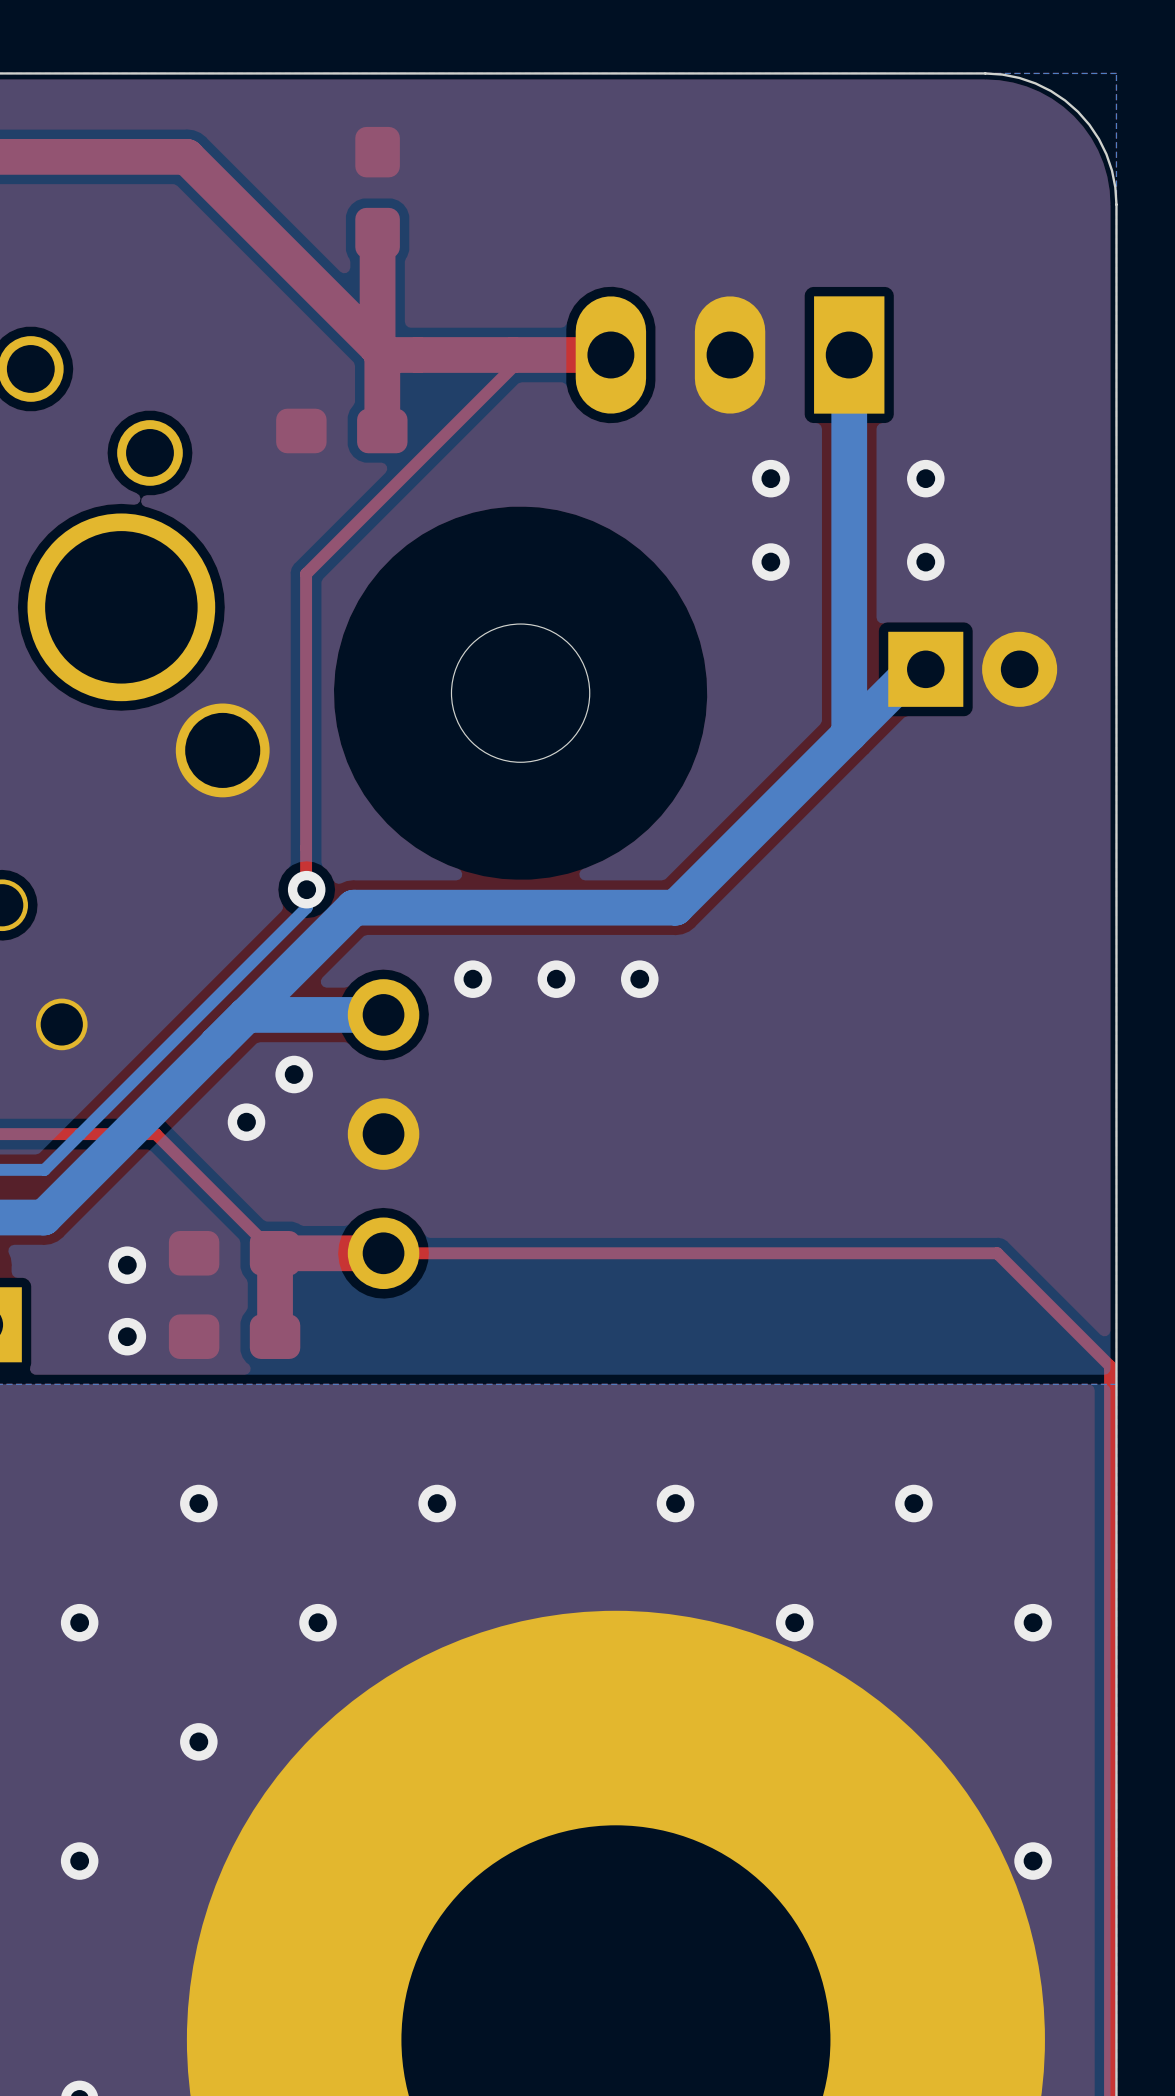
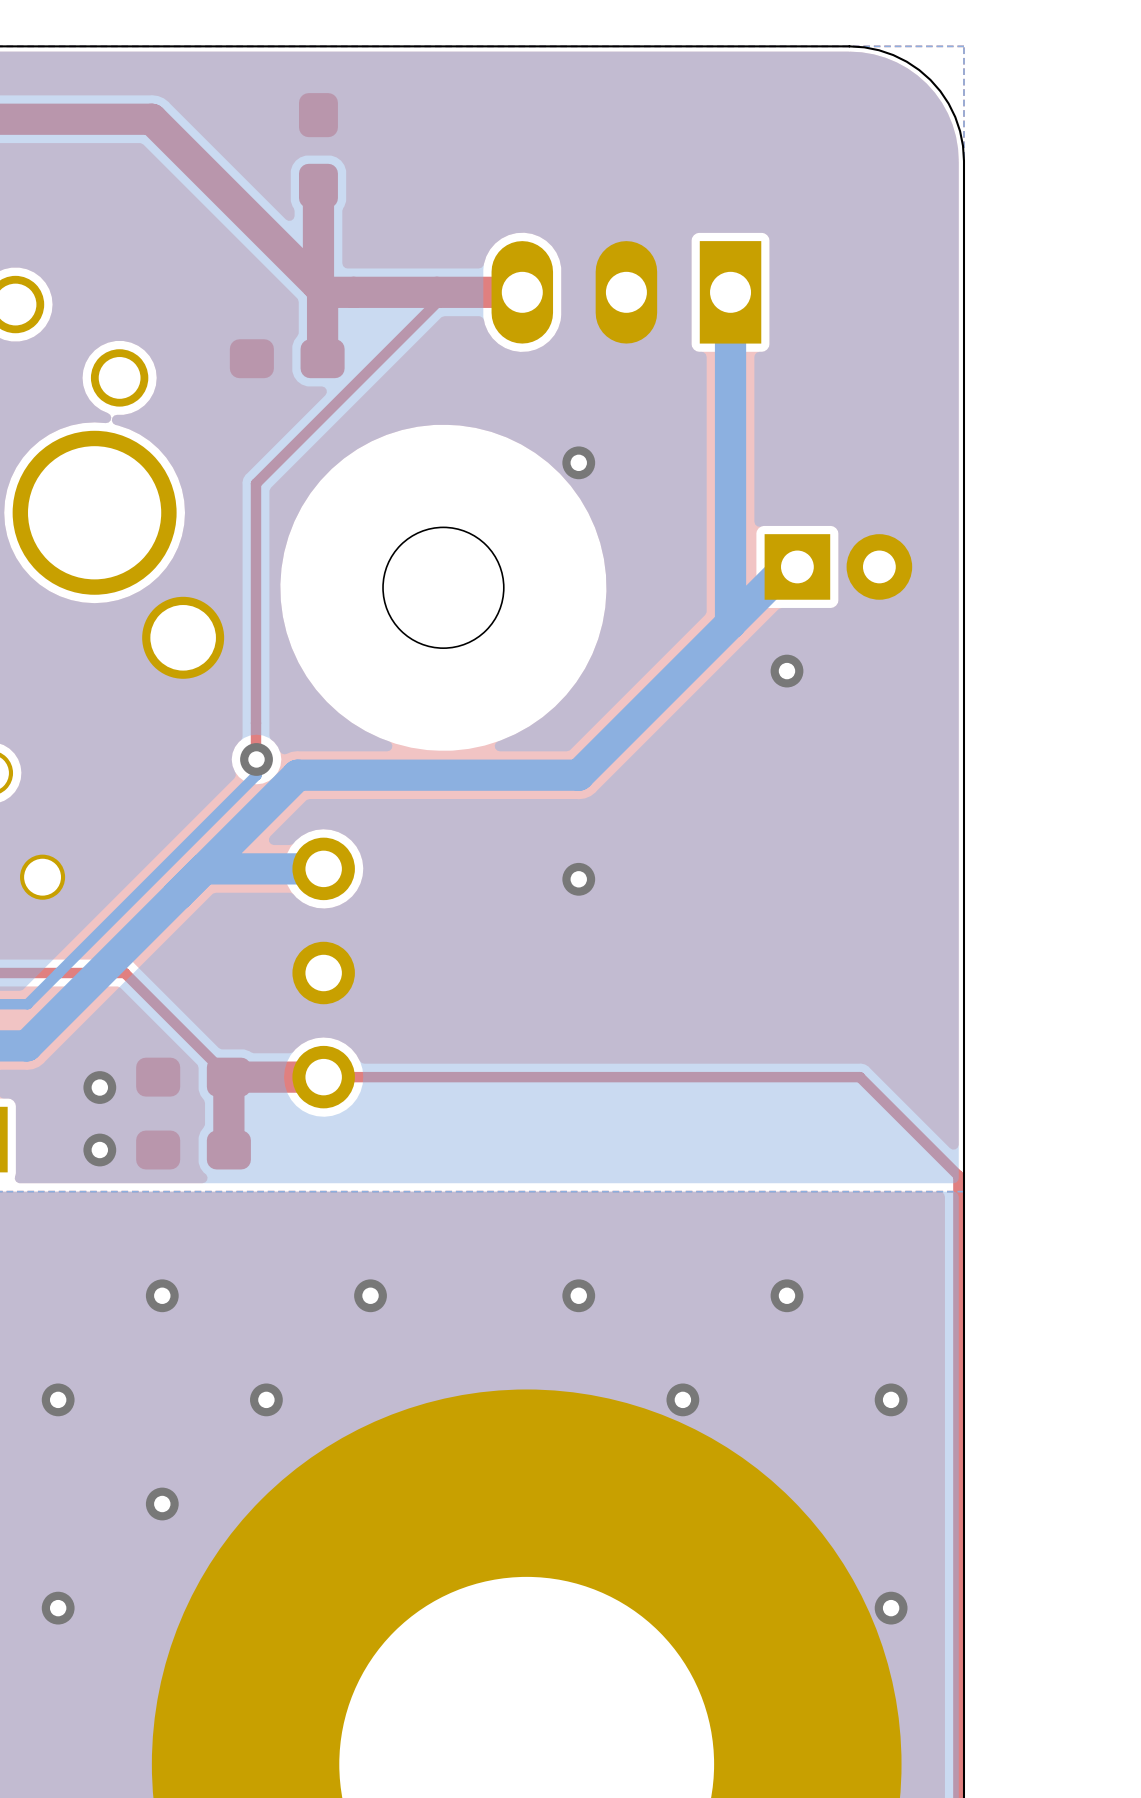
via: (770, 478) -> none
via: (925, 478) -> none
via: none -> (578, 462)
via: (770, 562) -> none
via: (925, 562) -> none
via: none -> (786, 671)
via: (472, 979) -> none
via: (556, 979) -> none
via position: (639, 979) -> (578, 879)
via: (294, 1074) -> none
via: (246, 1122) -> none

